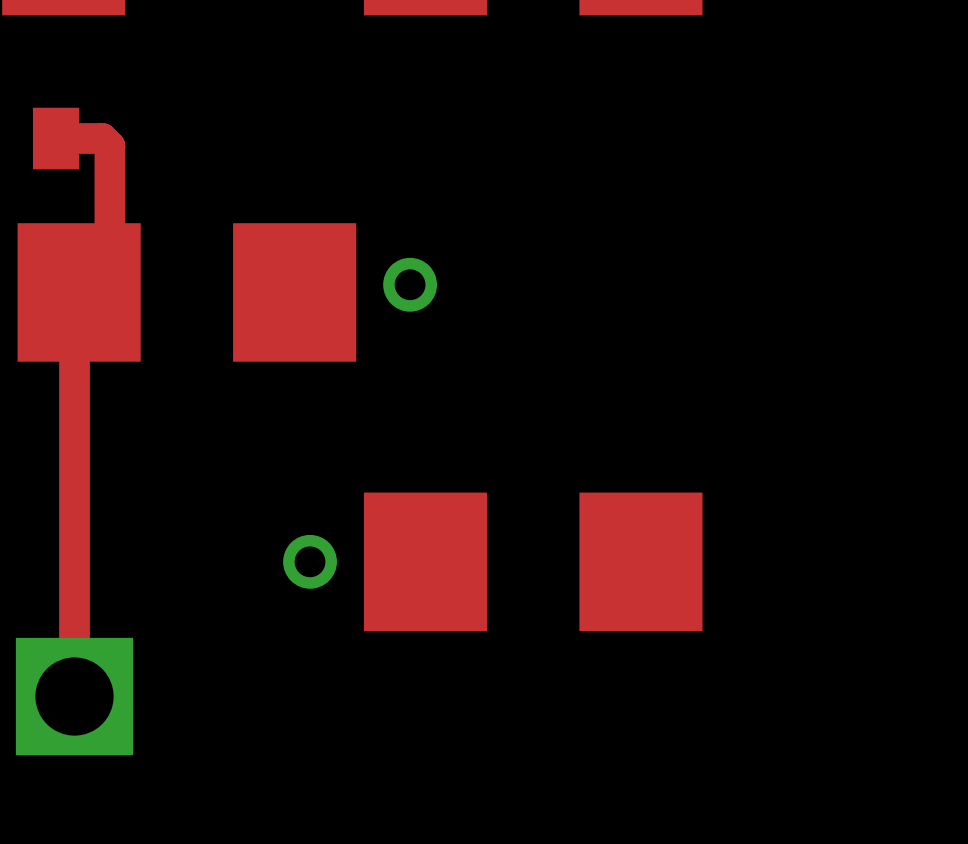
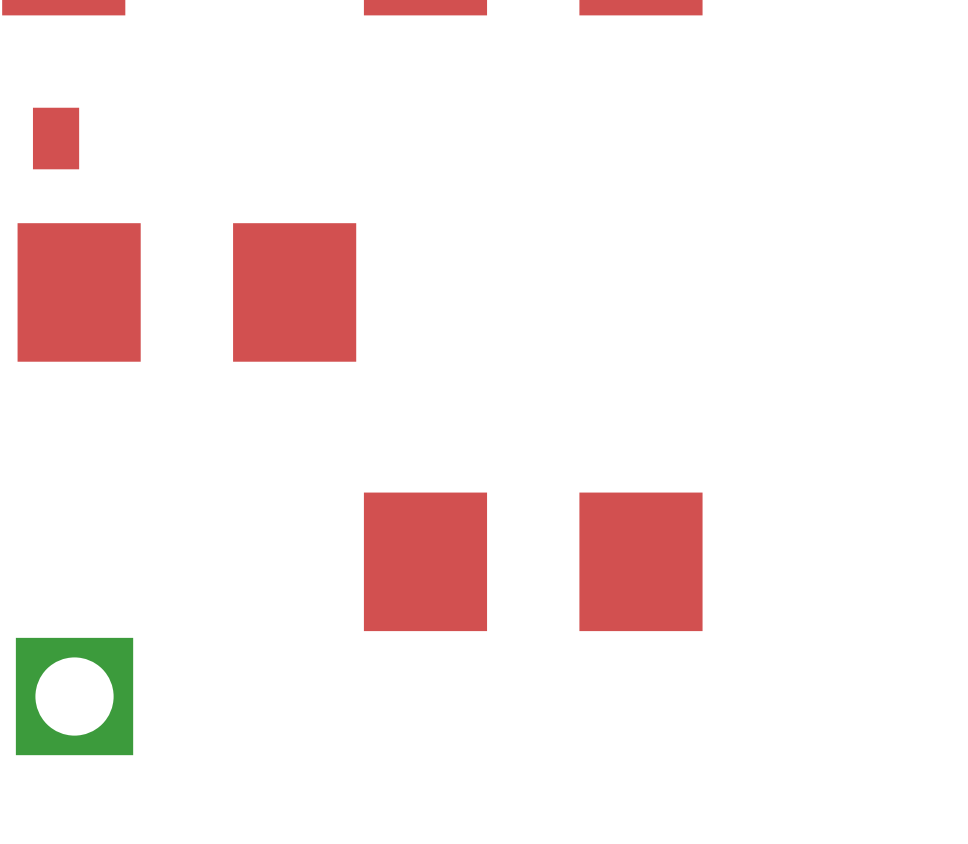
top track: (56, 138) (102, 138) (109, 146) (109, 272) (74, 307) -> none
via: (410, 284) -> none
top track: (79, 292) (74, 297) (74, 696) -> none
via: (310, 561) -> none

